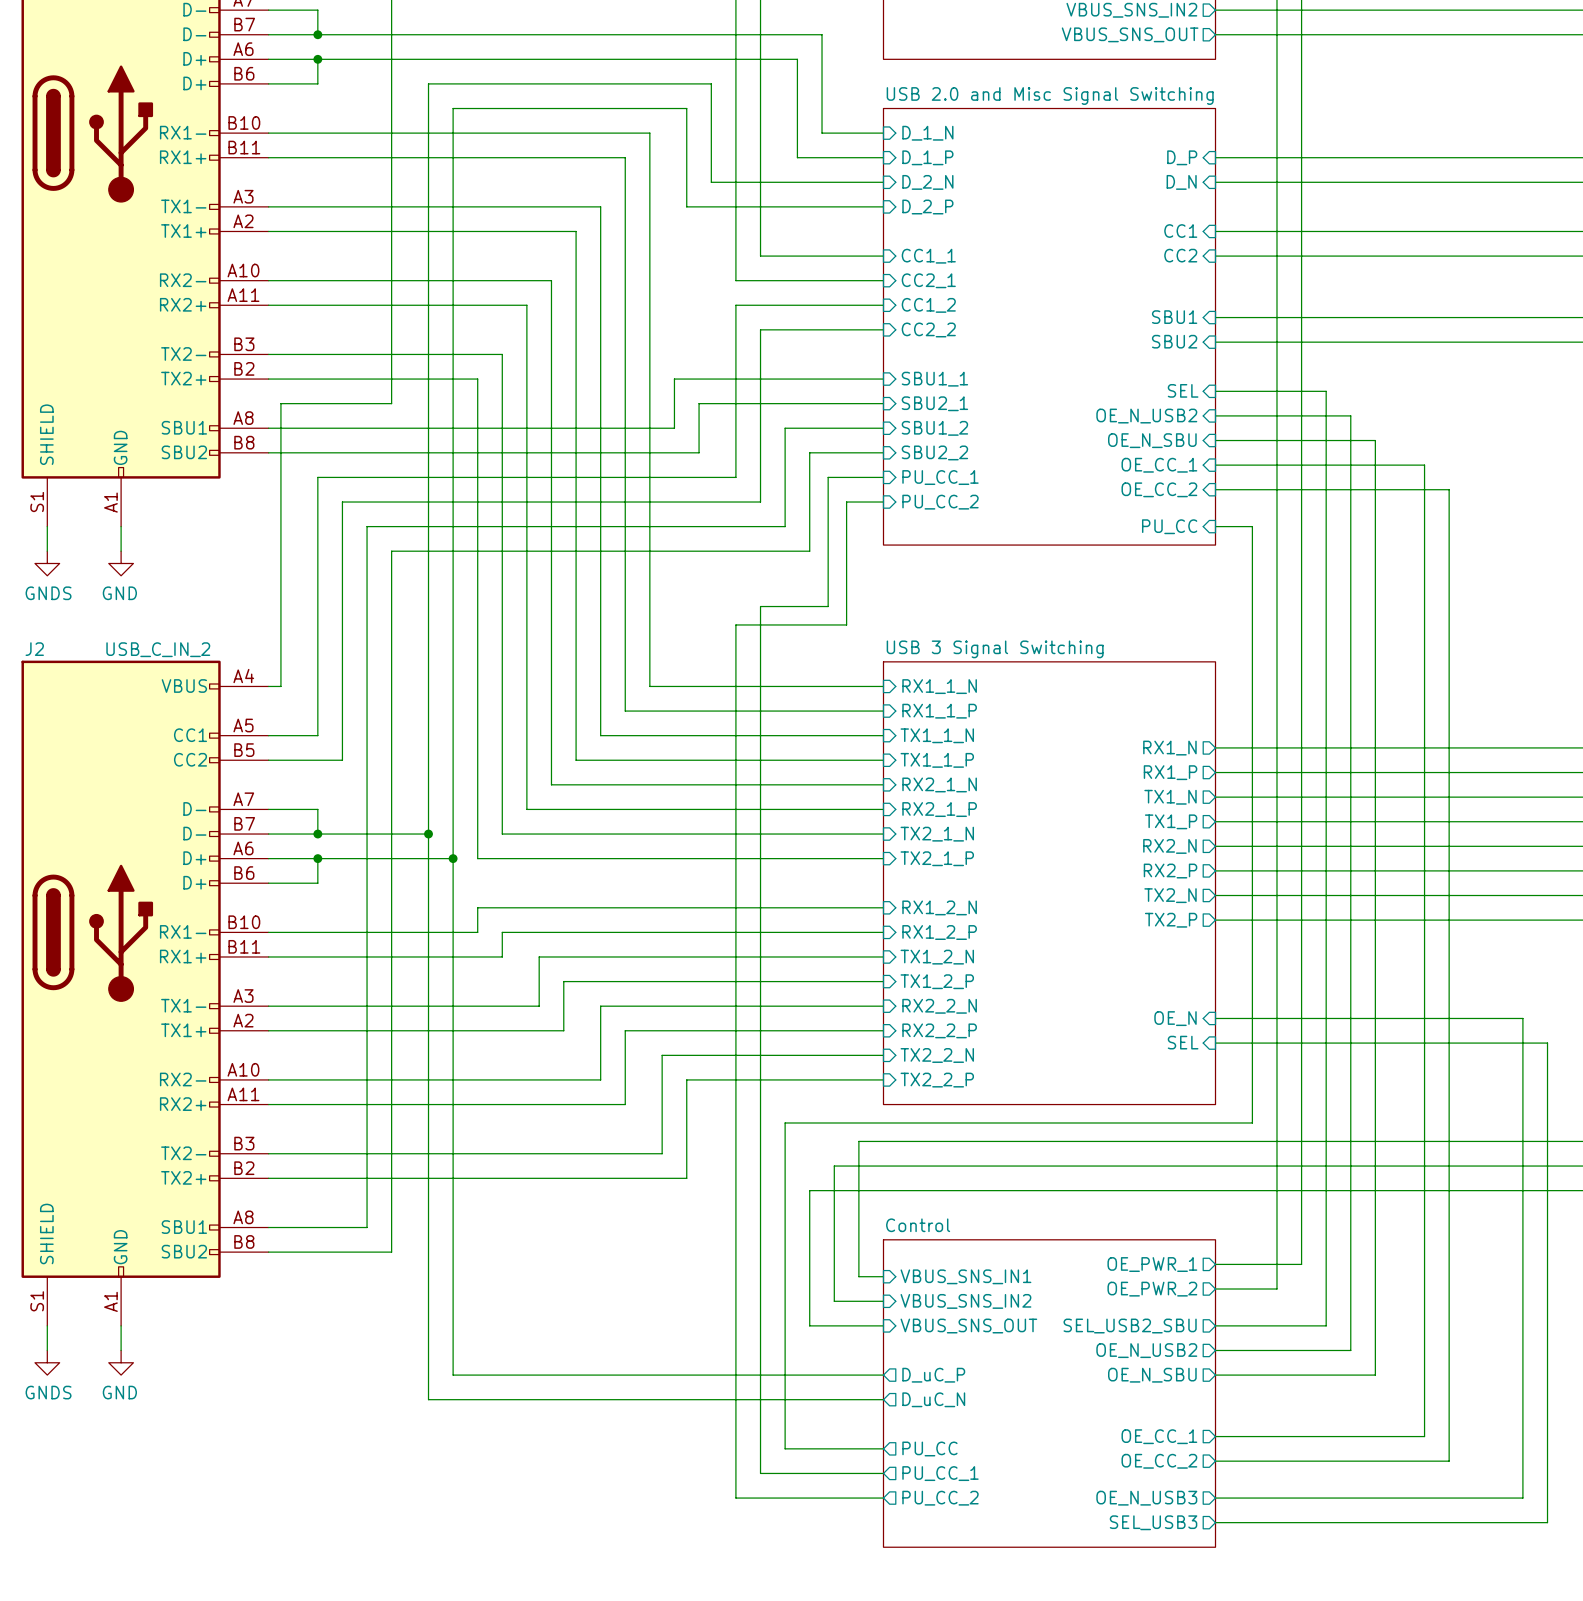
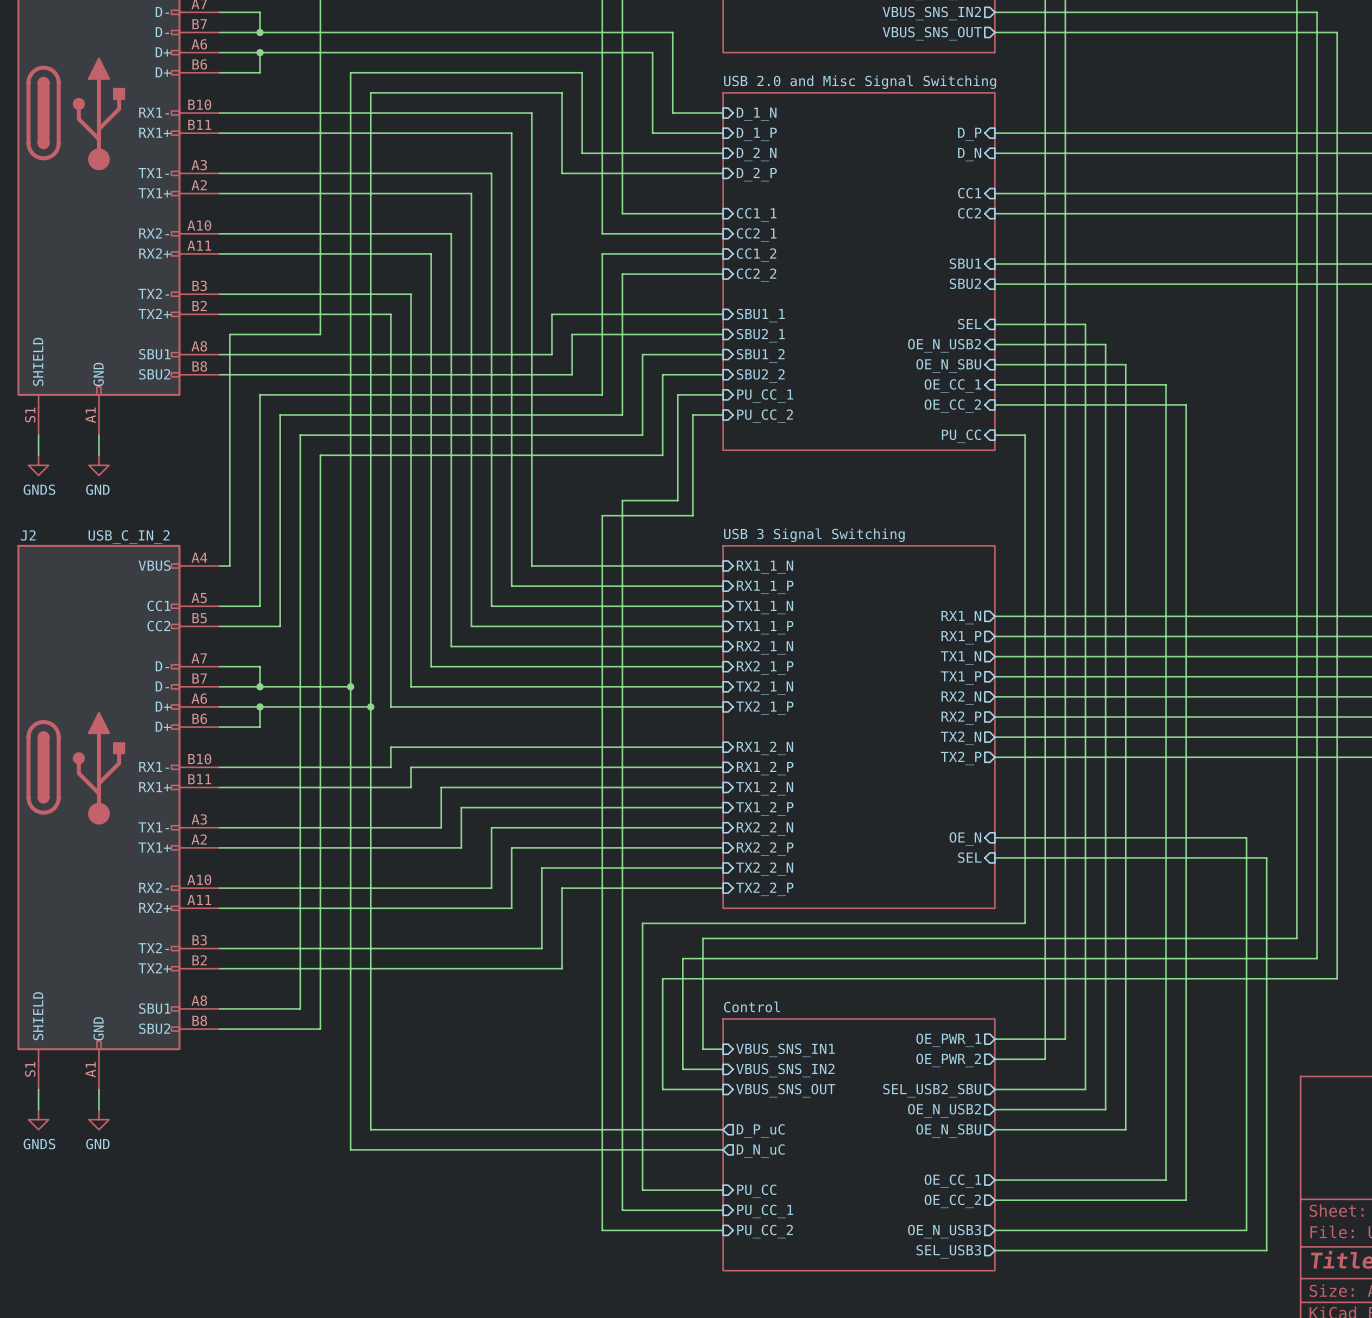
sheet pin: D_uC_P (933, 1375) -> D_P_uC (760, 1130)
sheet pin: D_uC_N (933, 1399) -> D_N_uC (760, 1151)
sheet pin shape: output (929, 1448) -> input (756, 1191)
sheet pin shape: output (940, 1473) -> input (765, 1211)
sheet pin shape: output (940, 1498) -> input (765, 1231)

